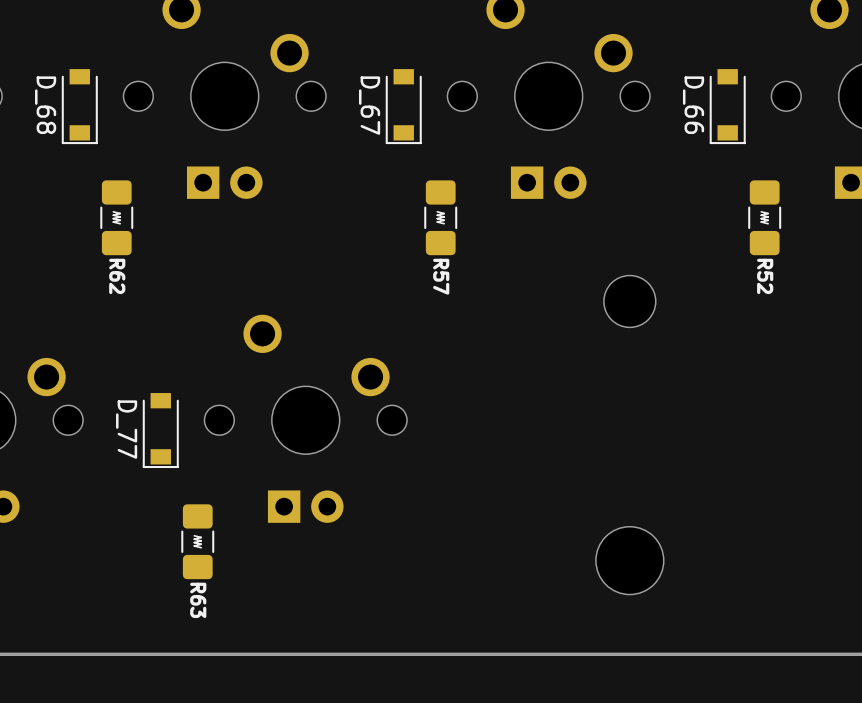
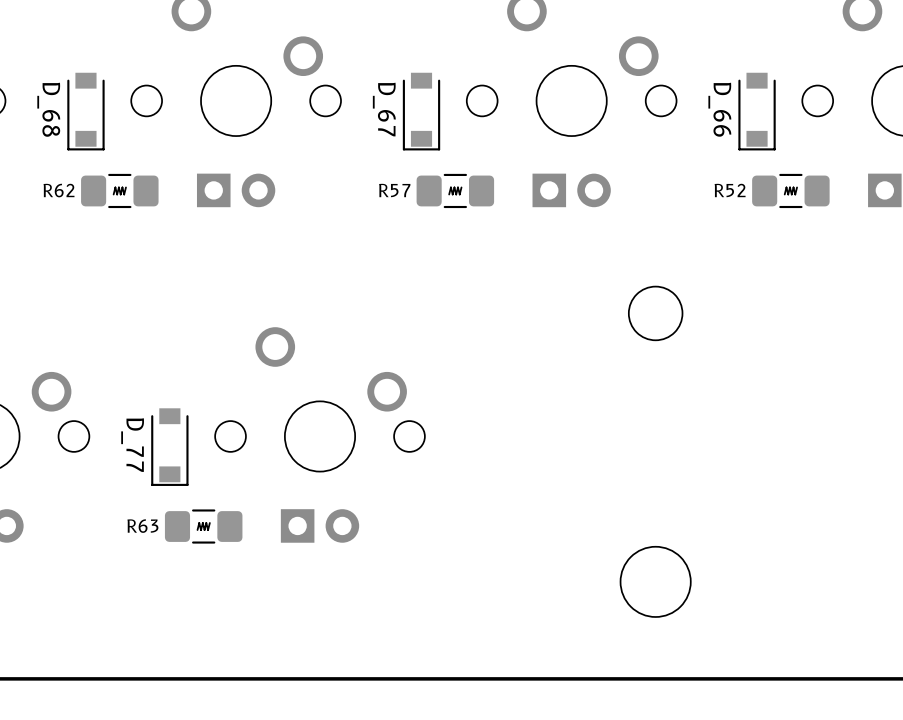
R62 rotation: 0° (116, 217) -> 90° clockwise (119, 190)
R57 rotation: 0° (440, 217) -> 90° clockwise (455, 190)
R52 rotation: 0° (764, 217) -> 90° clockwise (790, 190)
R63 rotation: 0° (197, 541) -> 90° clockwise (203, 526)

